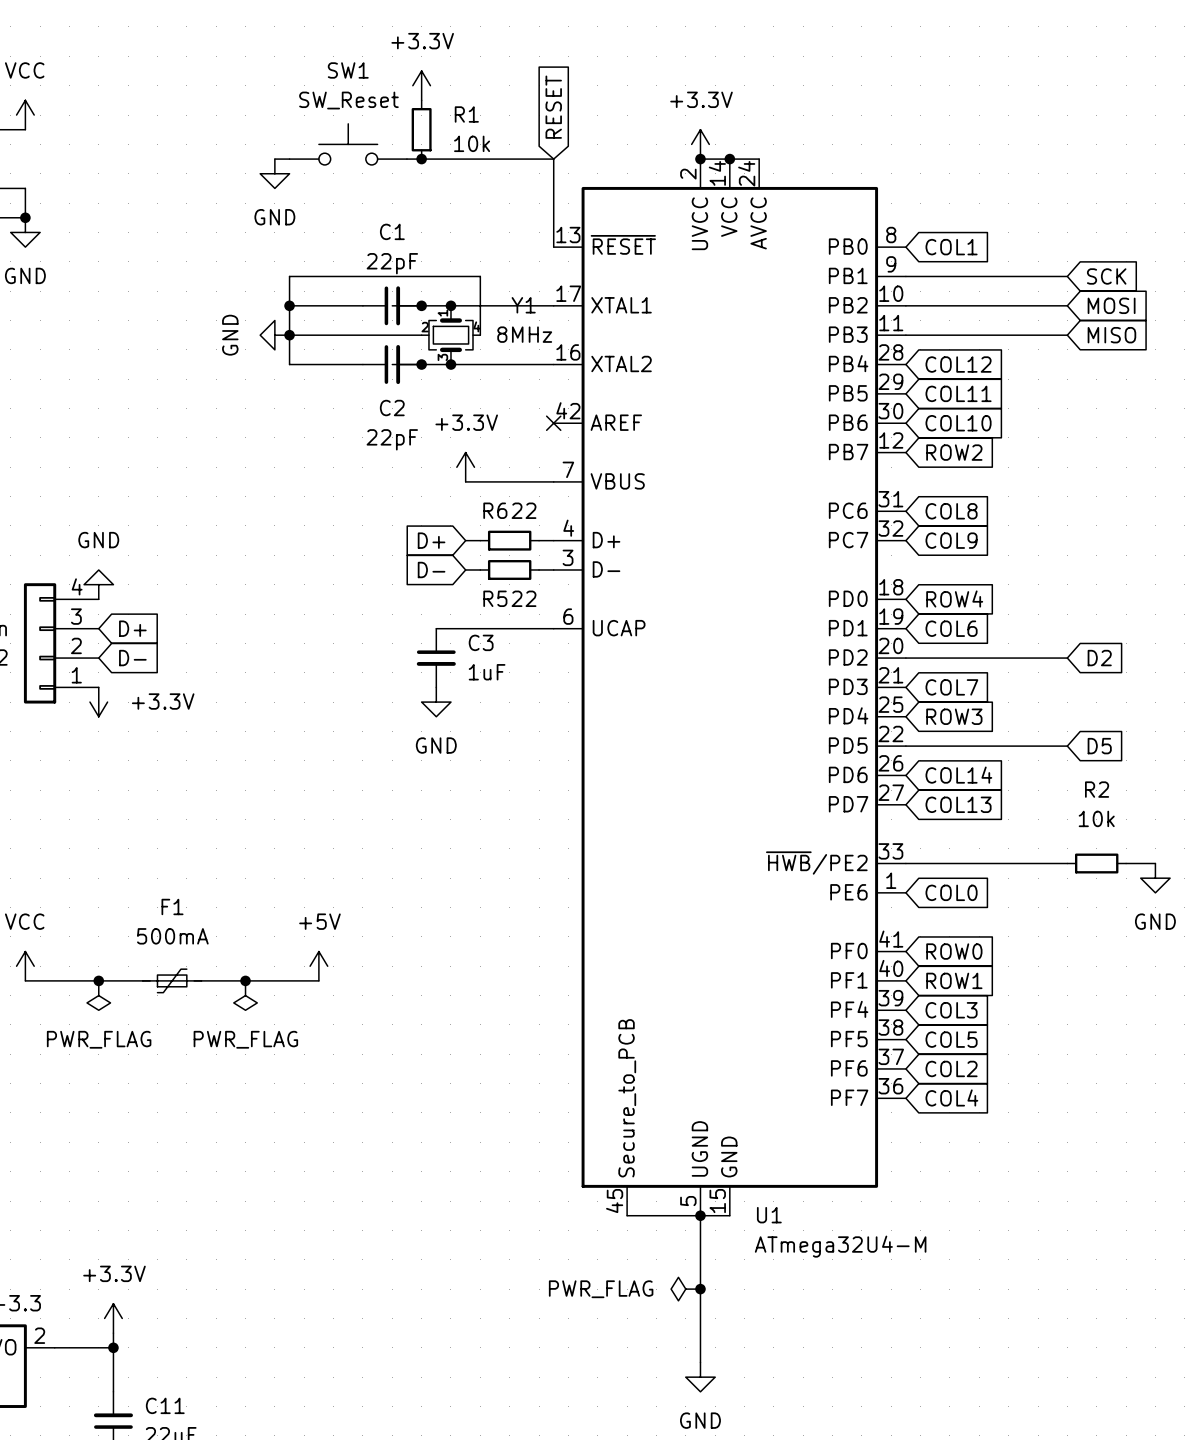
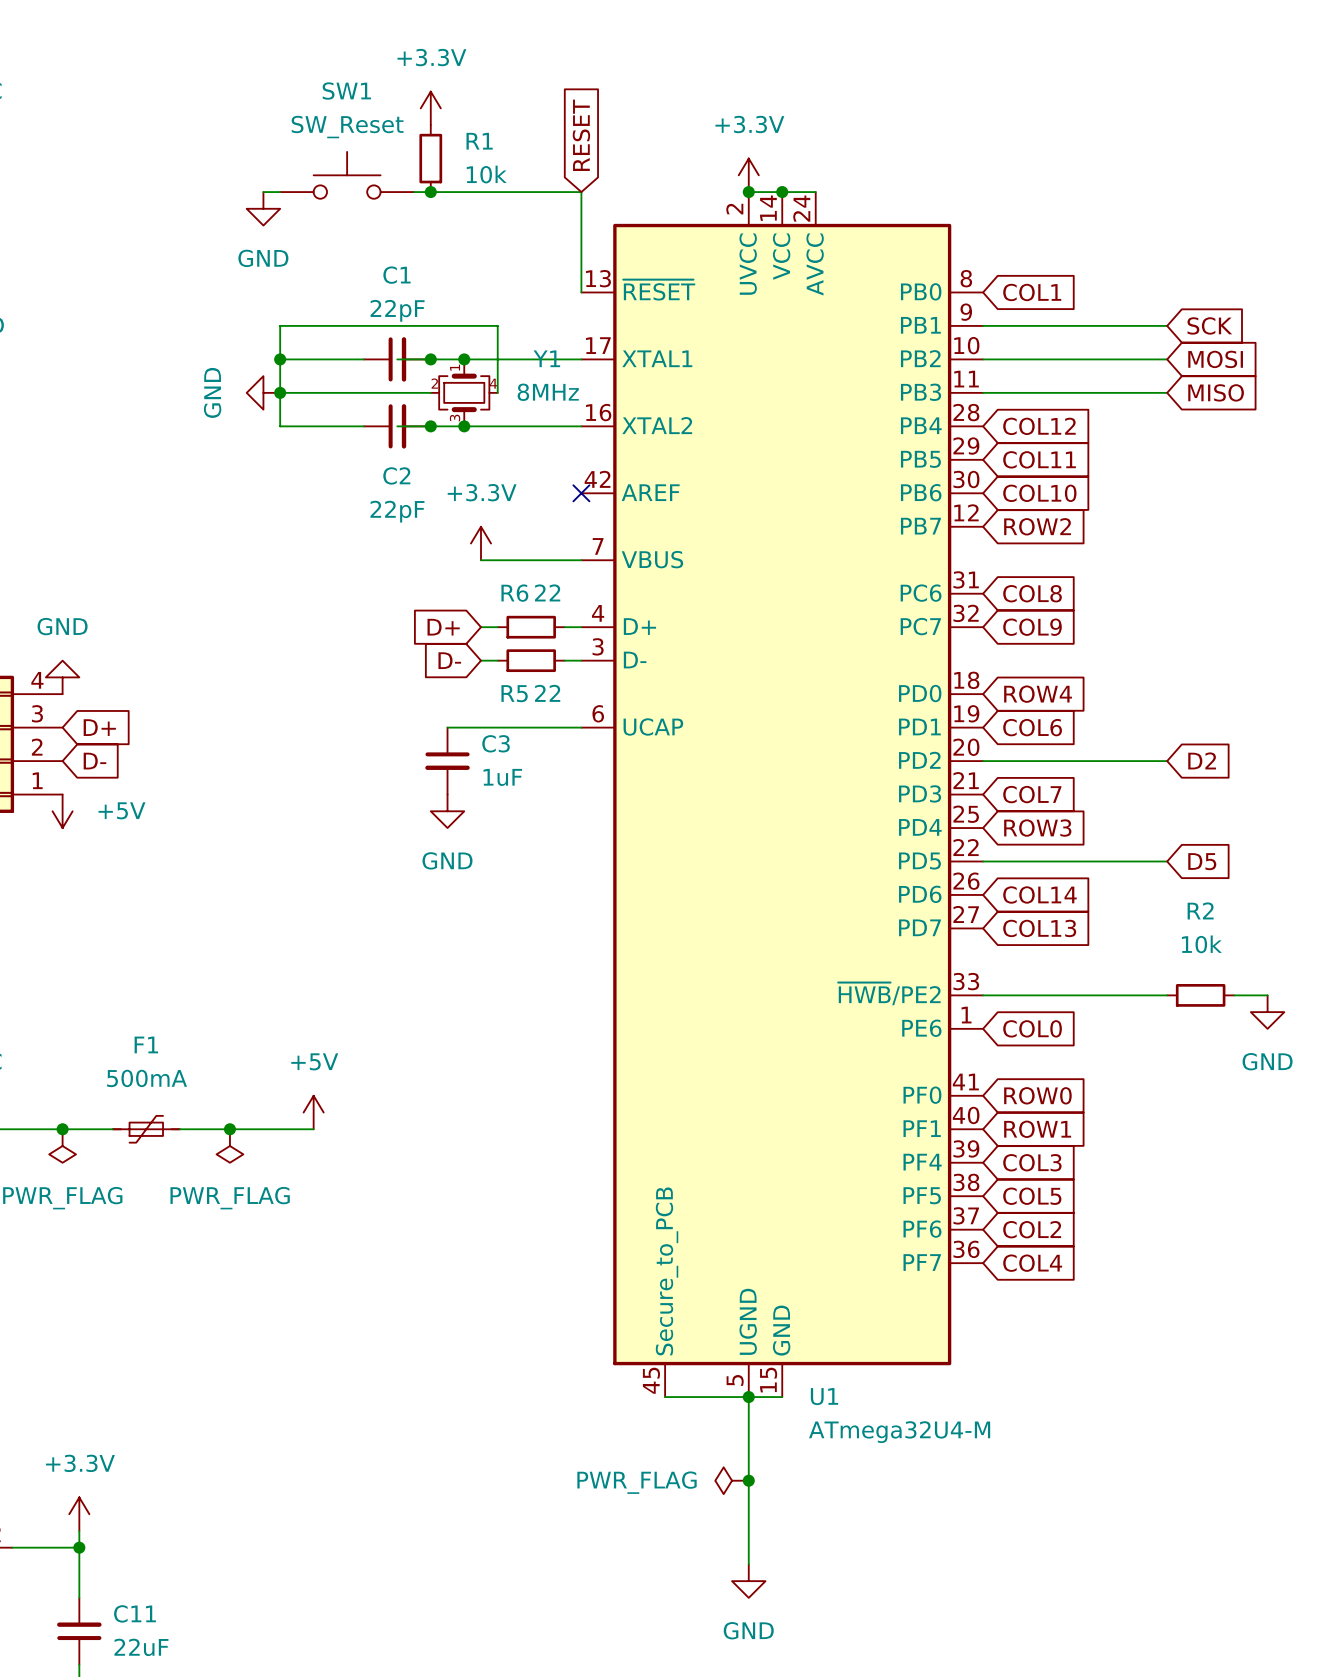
power symbol: +3.3V (98, 702) -> +5V (62, 811)

